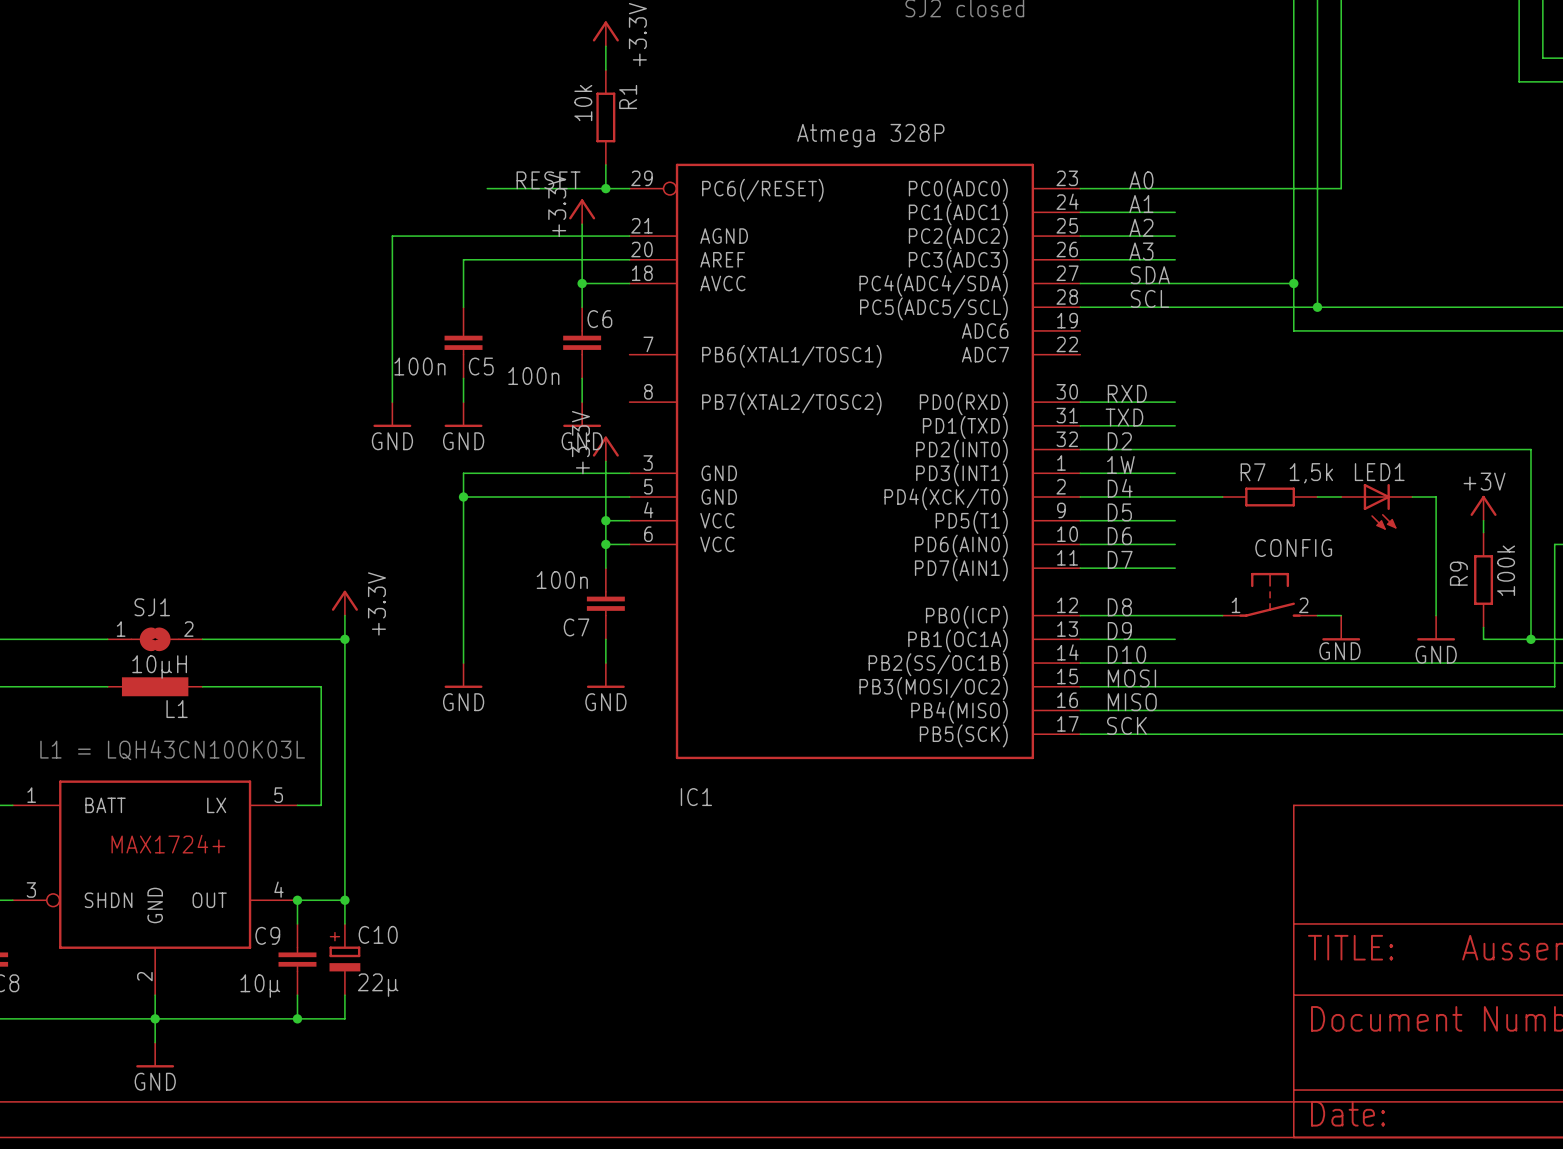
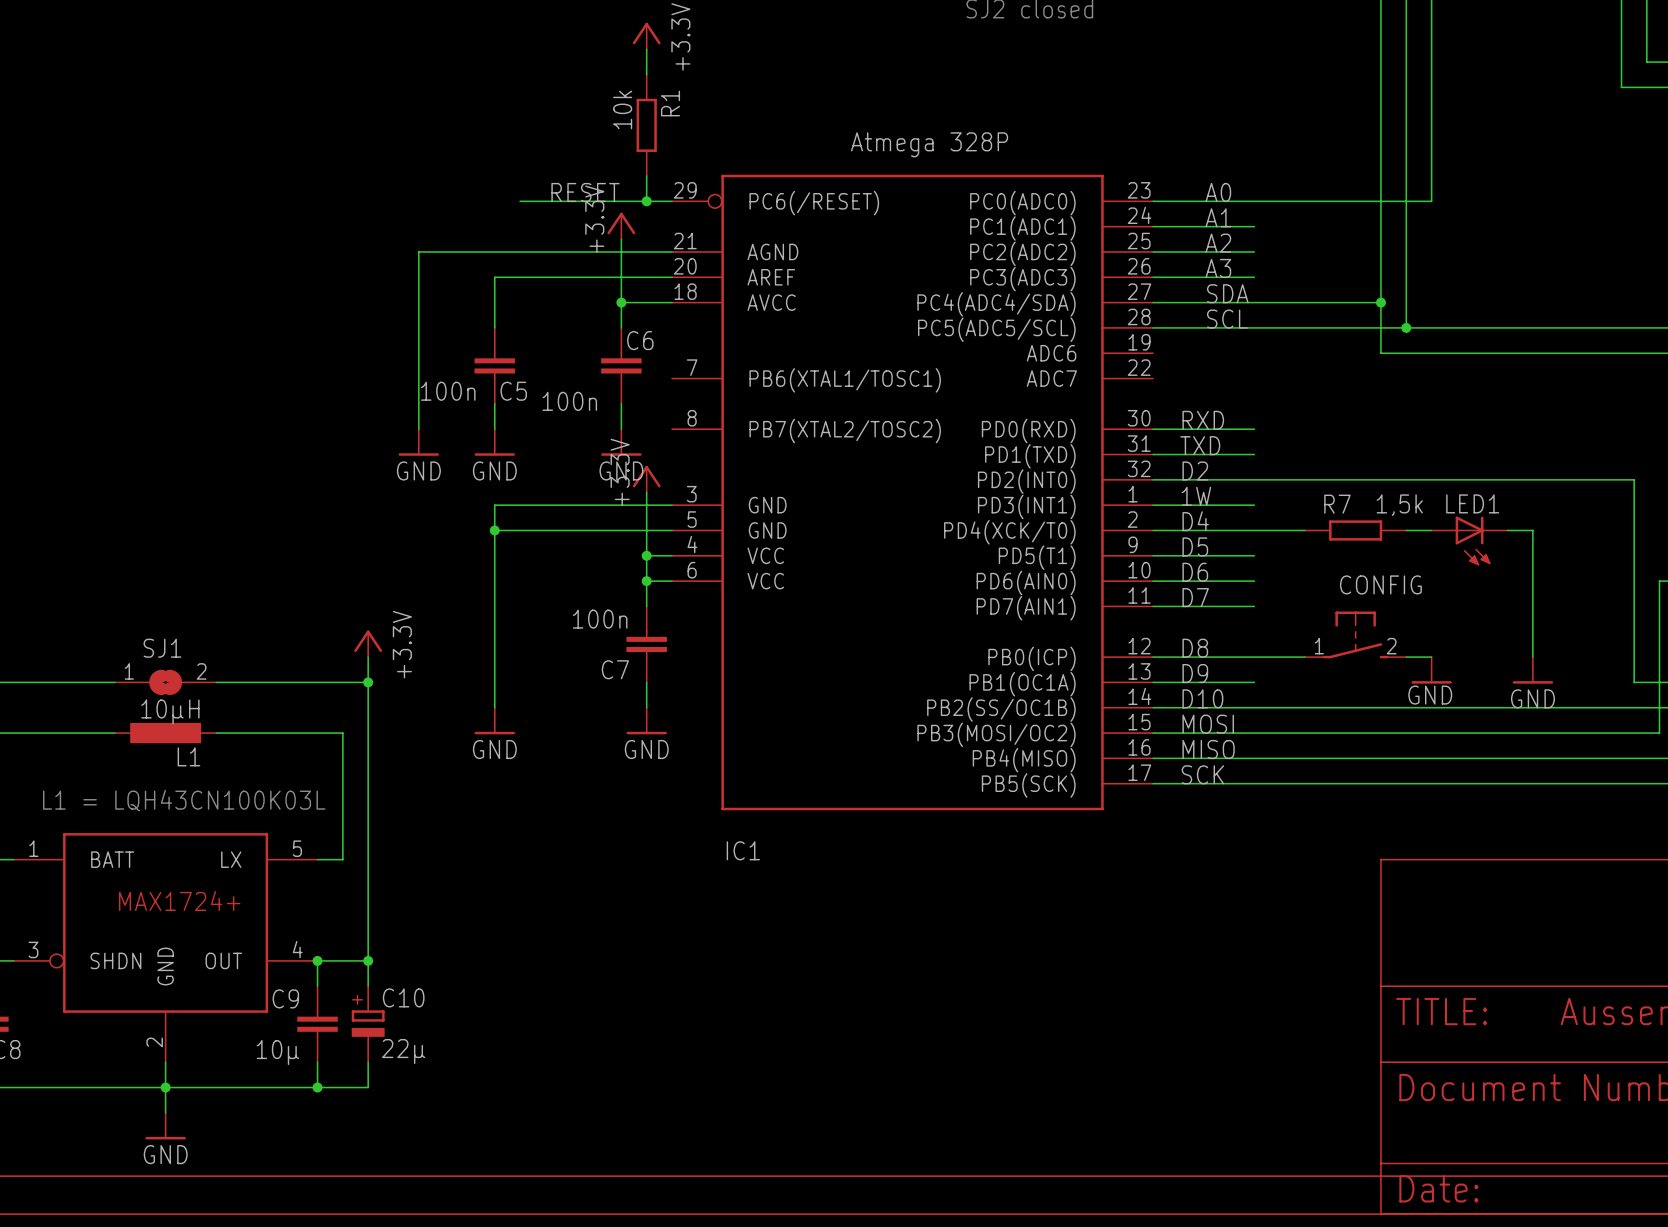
power symbol: +3V (1483, 508) -> none
wire: (1483, 520) (1483, 532) -> none
R9: 100k (1483, 580) -> none
wire: (1483, 627) (1483, 639) (1530, 639) -> none
junction: (1530, 639) -> none

